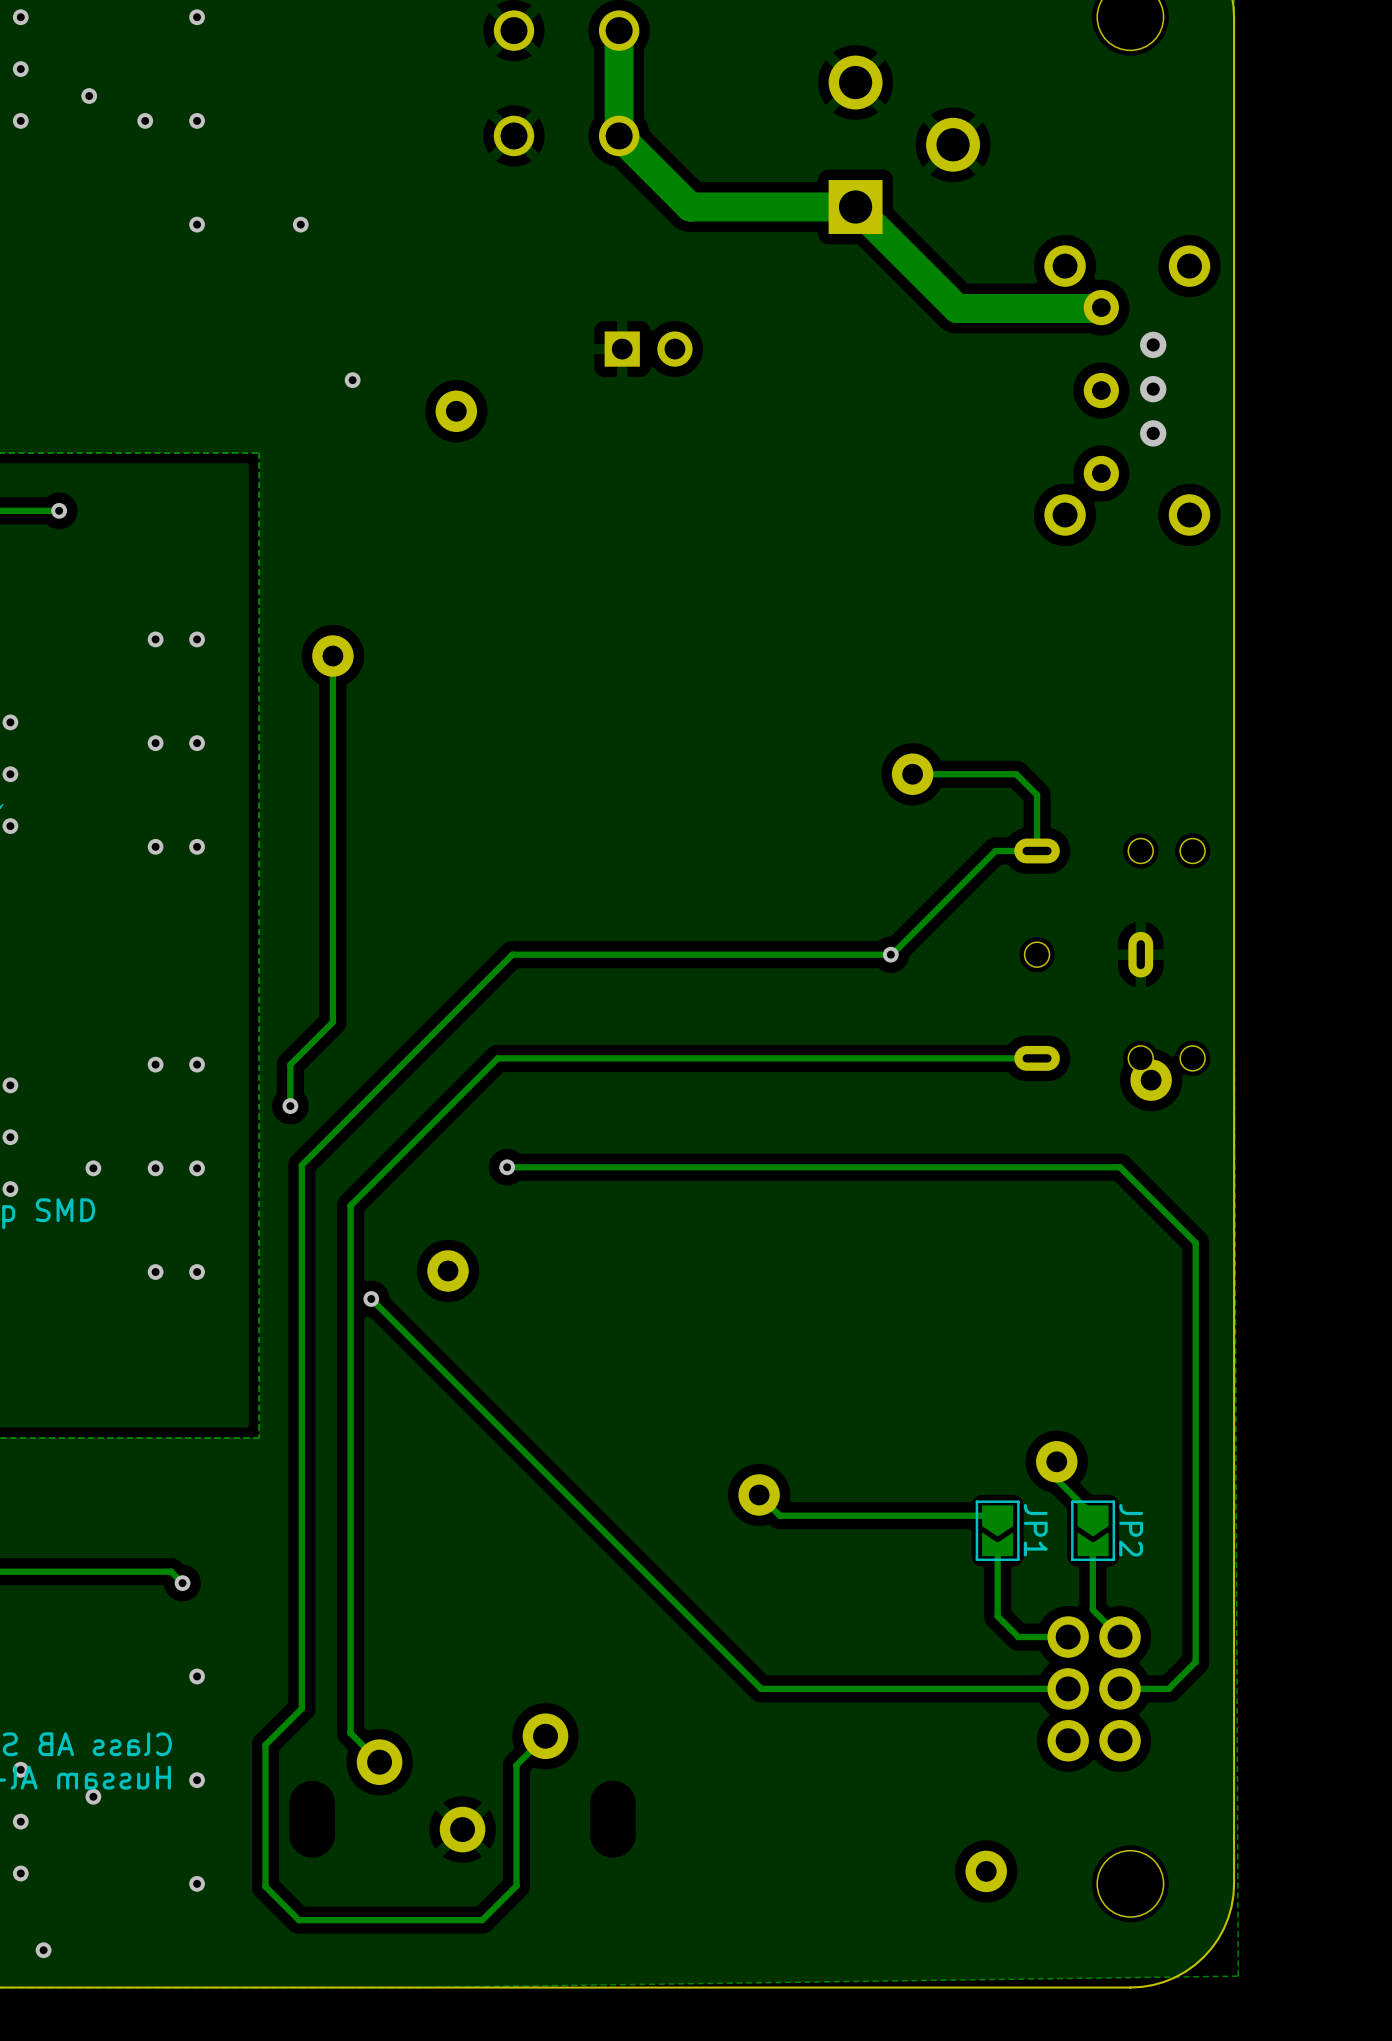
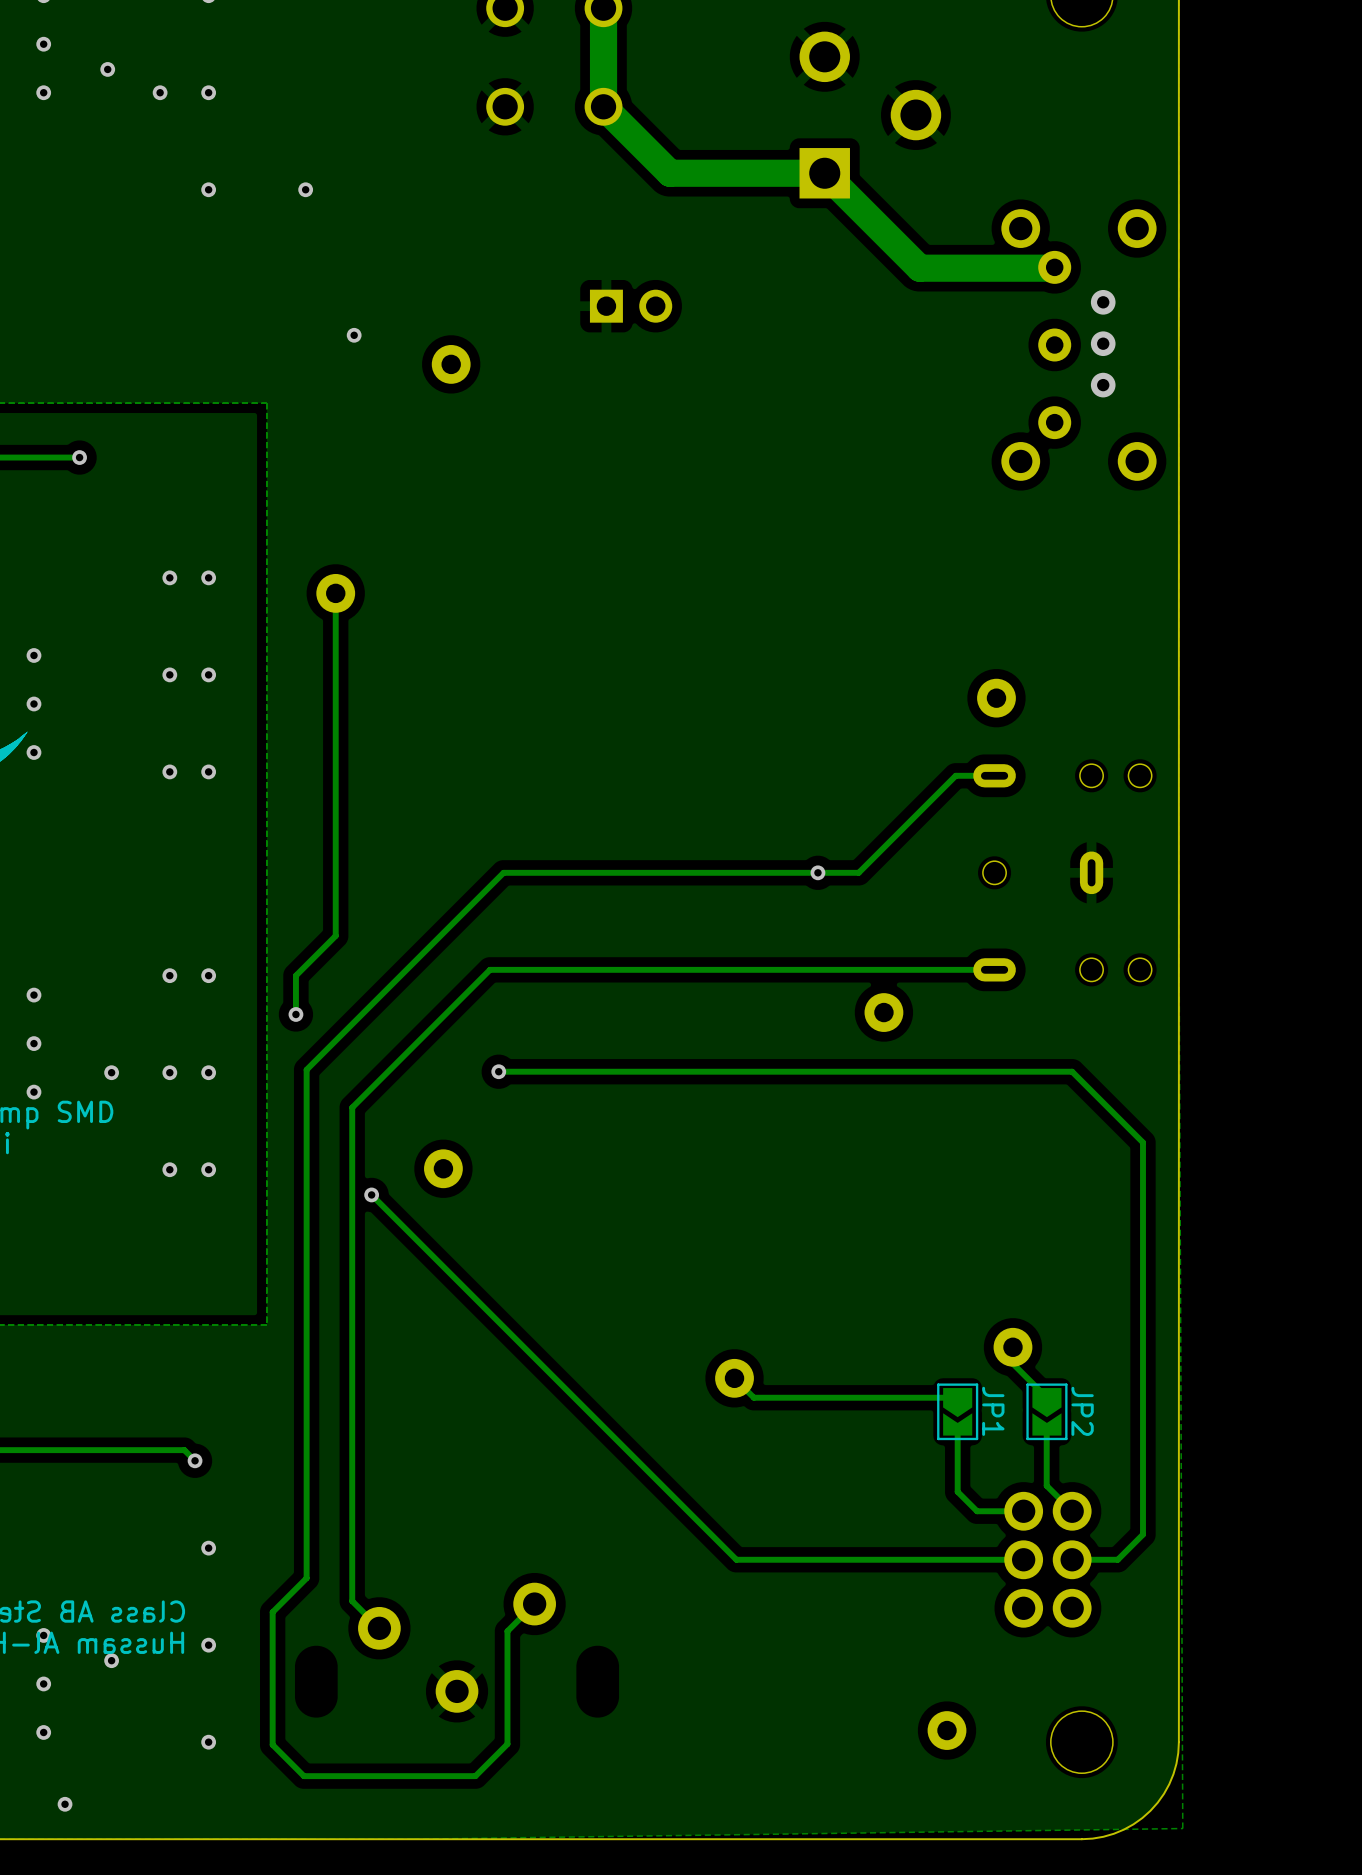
track: (912, 774) (1016, 774) (1037, 794) (1037, 850) -> none
part position: (912, 774) -> (996, 698)
via position: (890, 954) -> (817, 872)
part: (1151, 1080) -> none
part: none -> (883, 1012)

